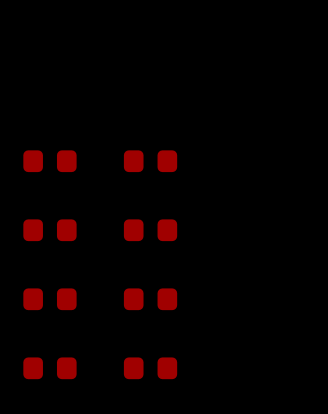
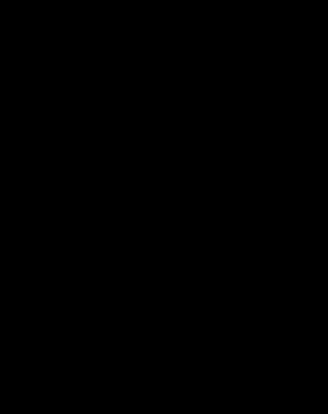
part: (49, 161) -> none
part: (150, 161) -> none
part: (49, 230) -> none
part: (150, 230) -> none
part: (49, 299) -> none
part: (150, 299) -> none
part: (49, 368) -> none
part: (150, 368) -> none

